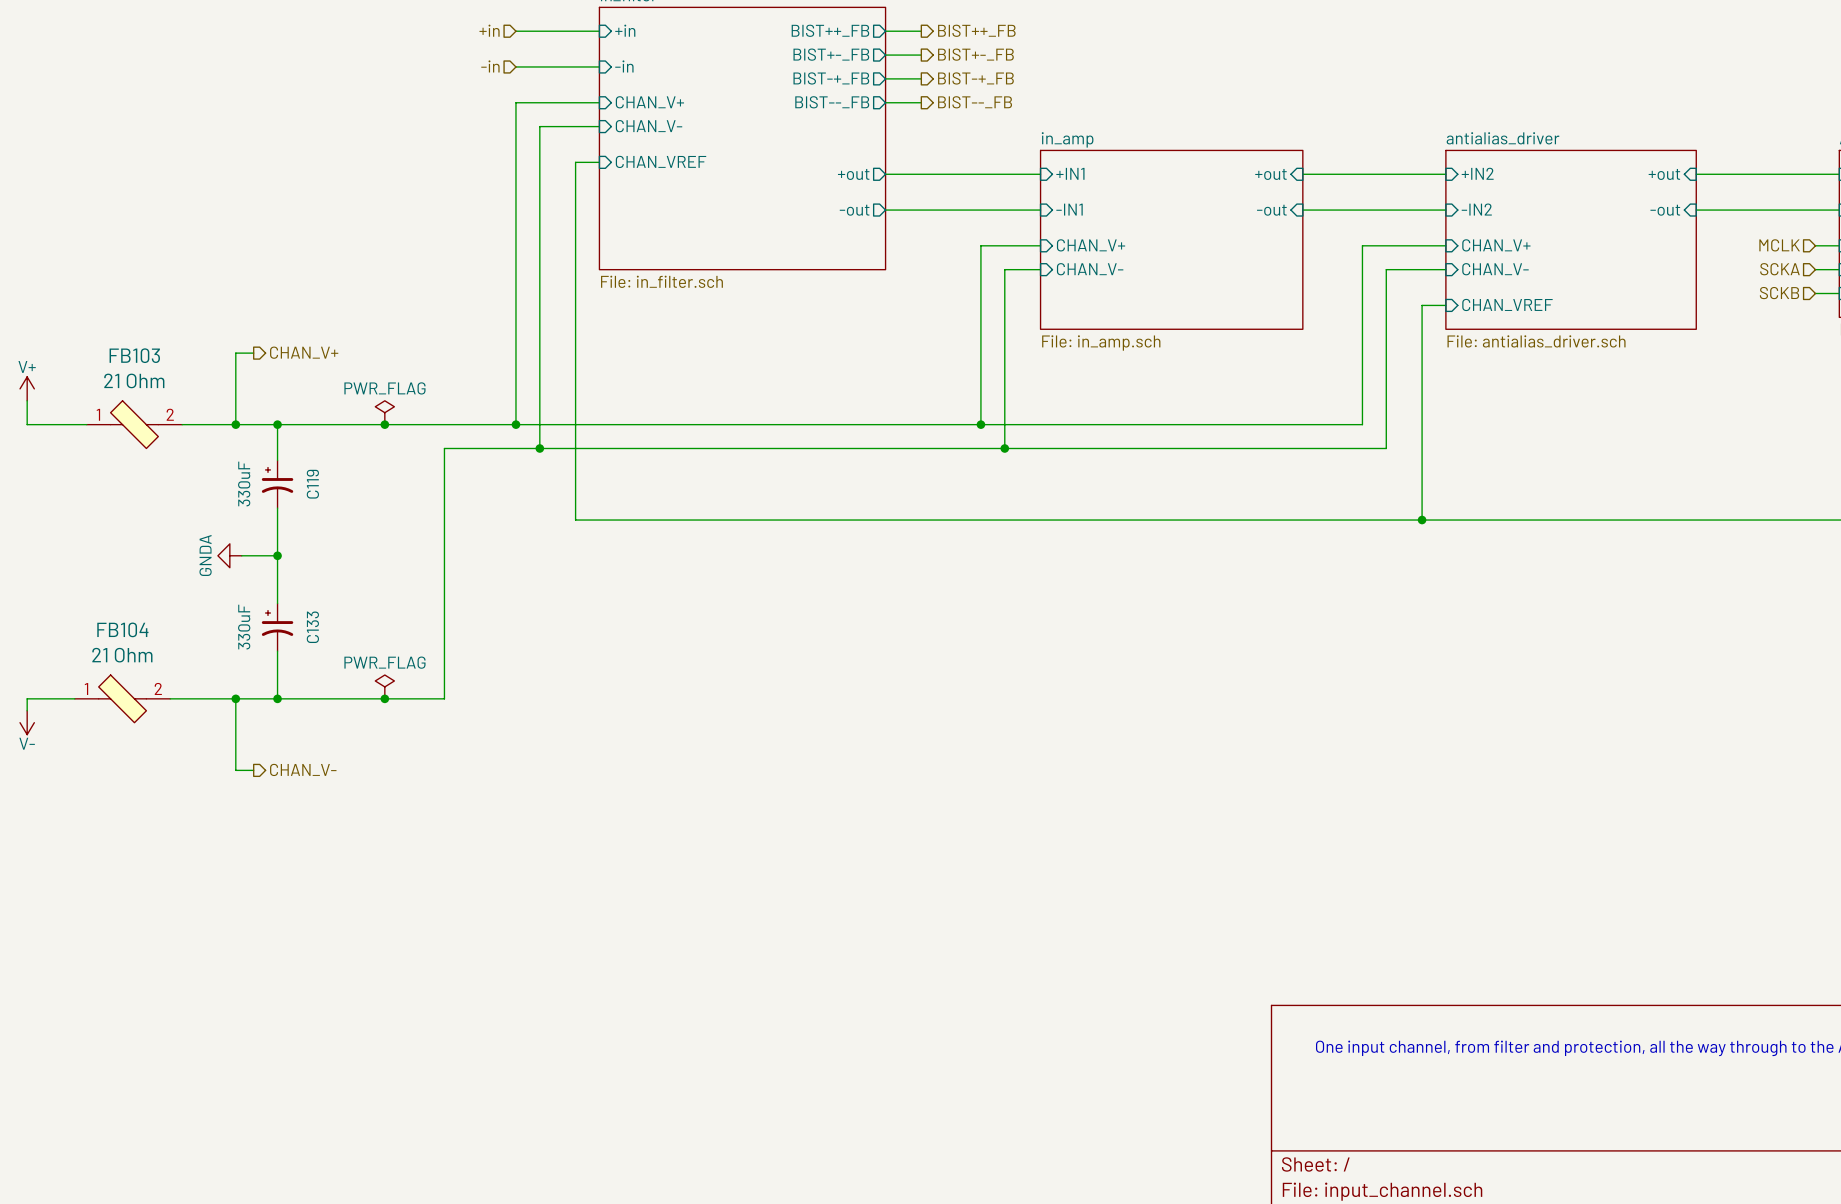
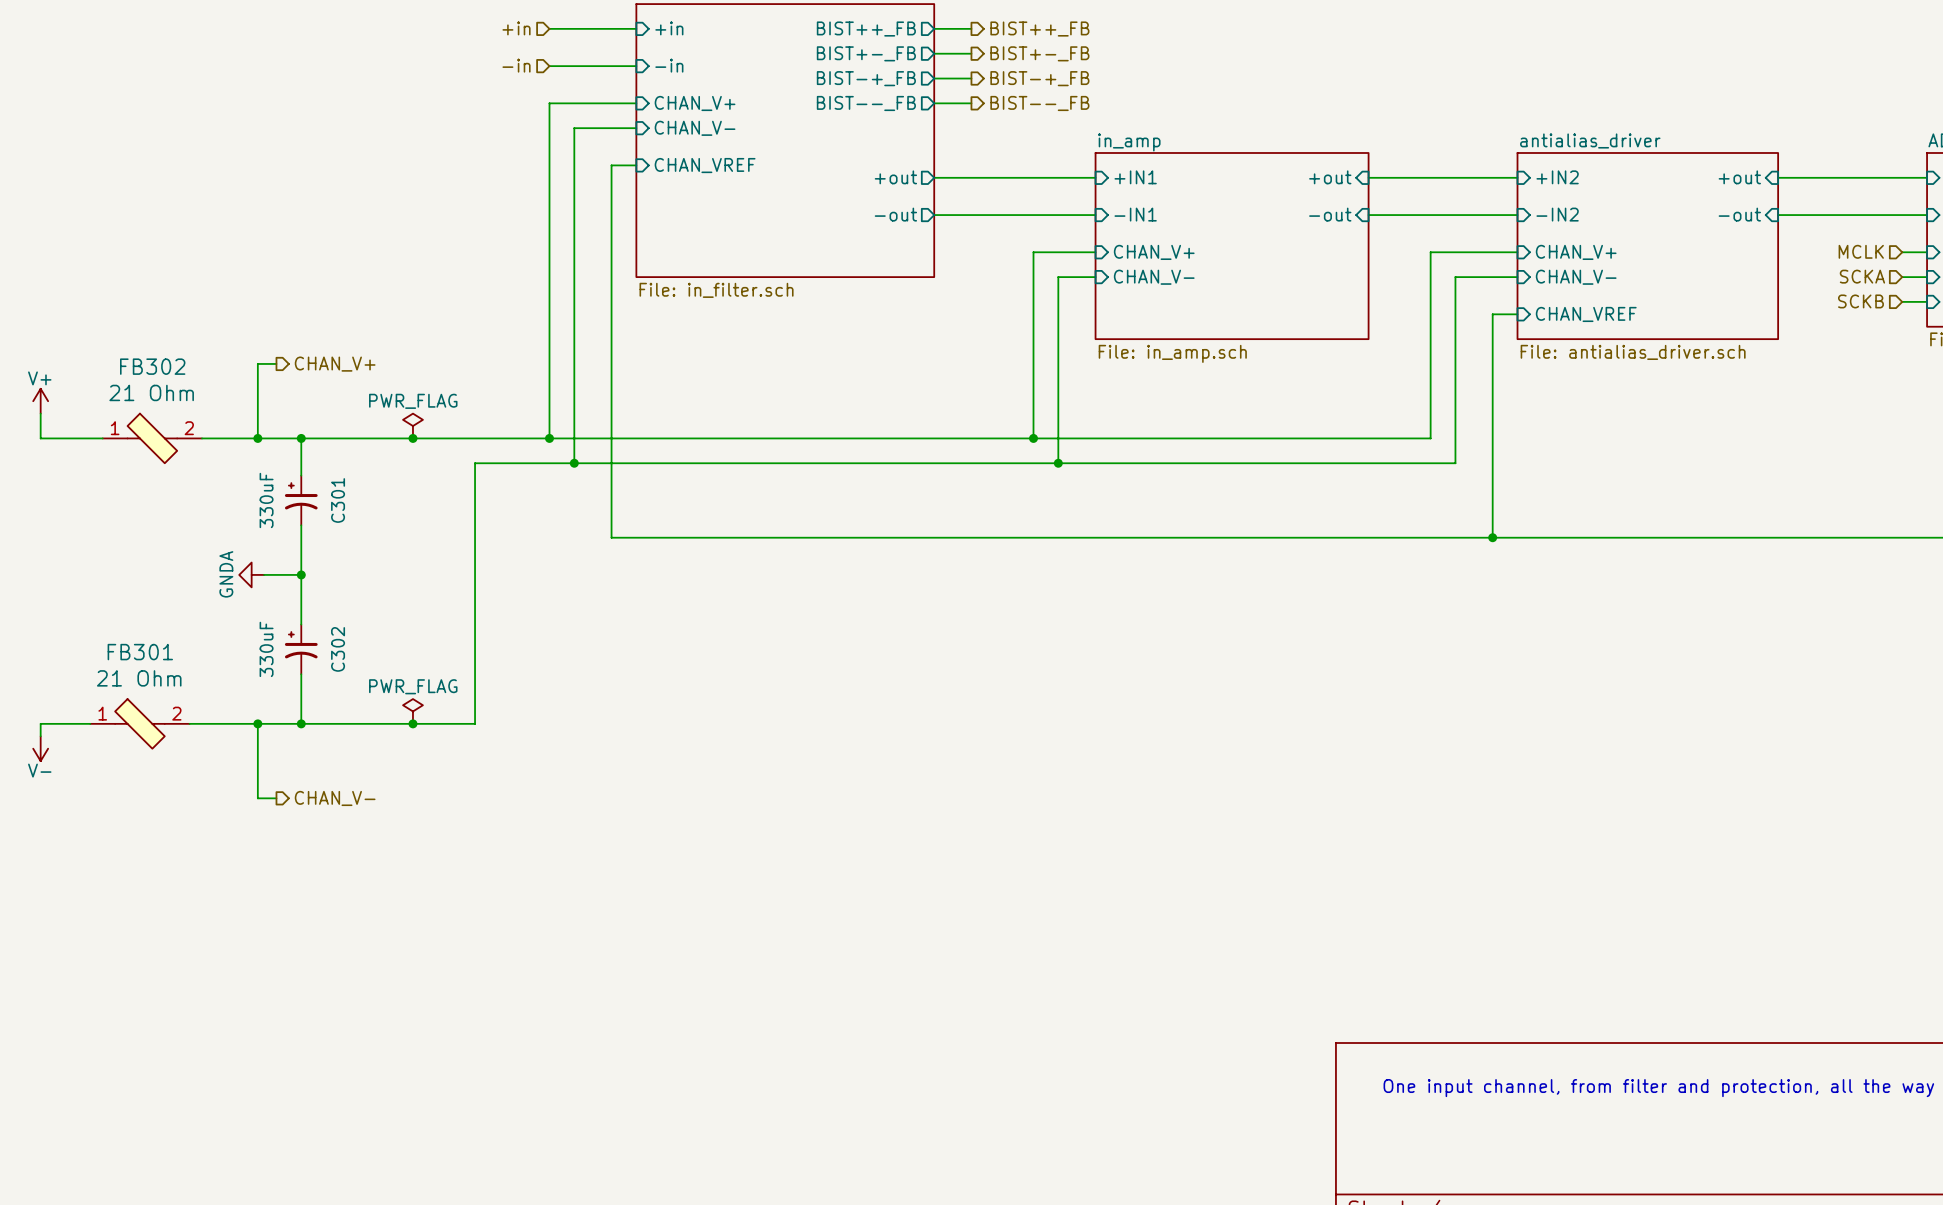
FB103 name: FB103 (134, 355) -> FB302 (152, 366)
C119 name: C119 (312, 484) -> C301 (338, 500)
C133 name: C133 (312, 627) -> C302 (338, 649)
FB104 name: FB104 (122, 629) -> FB301 (140, 652)

